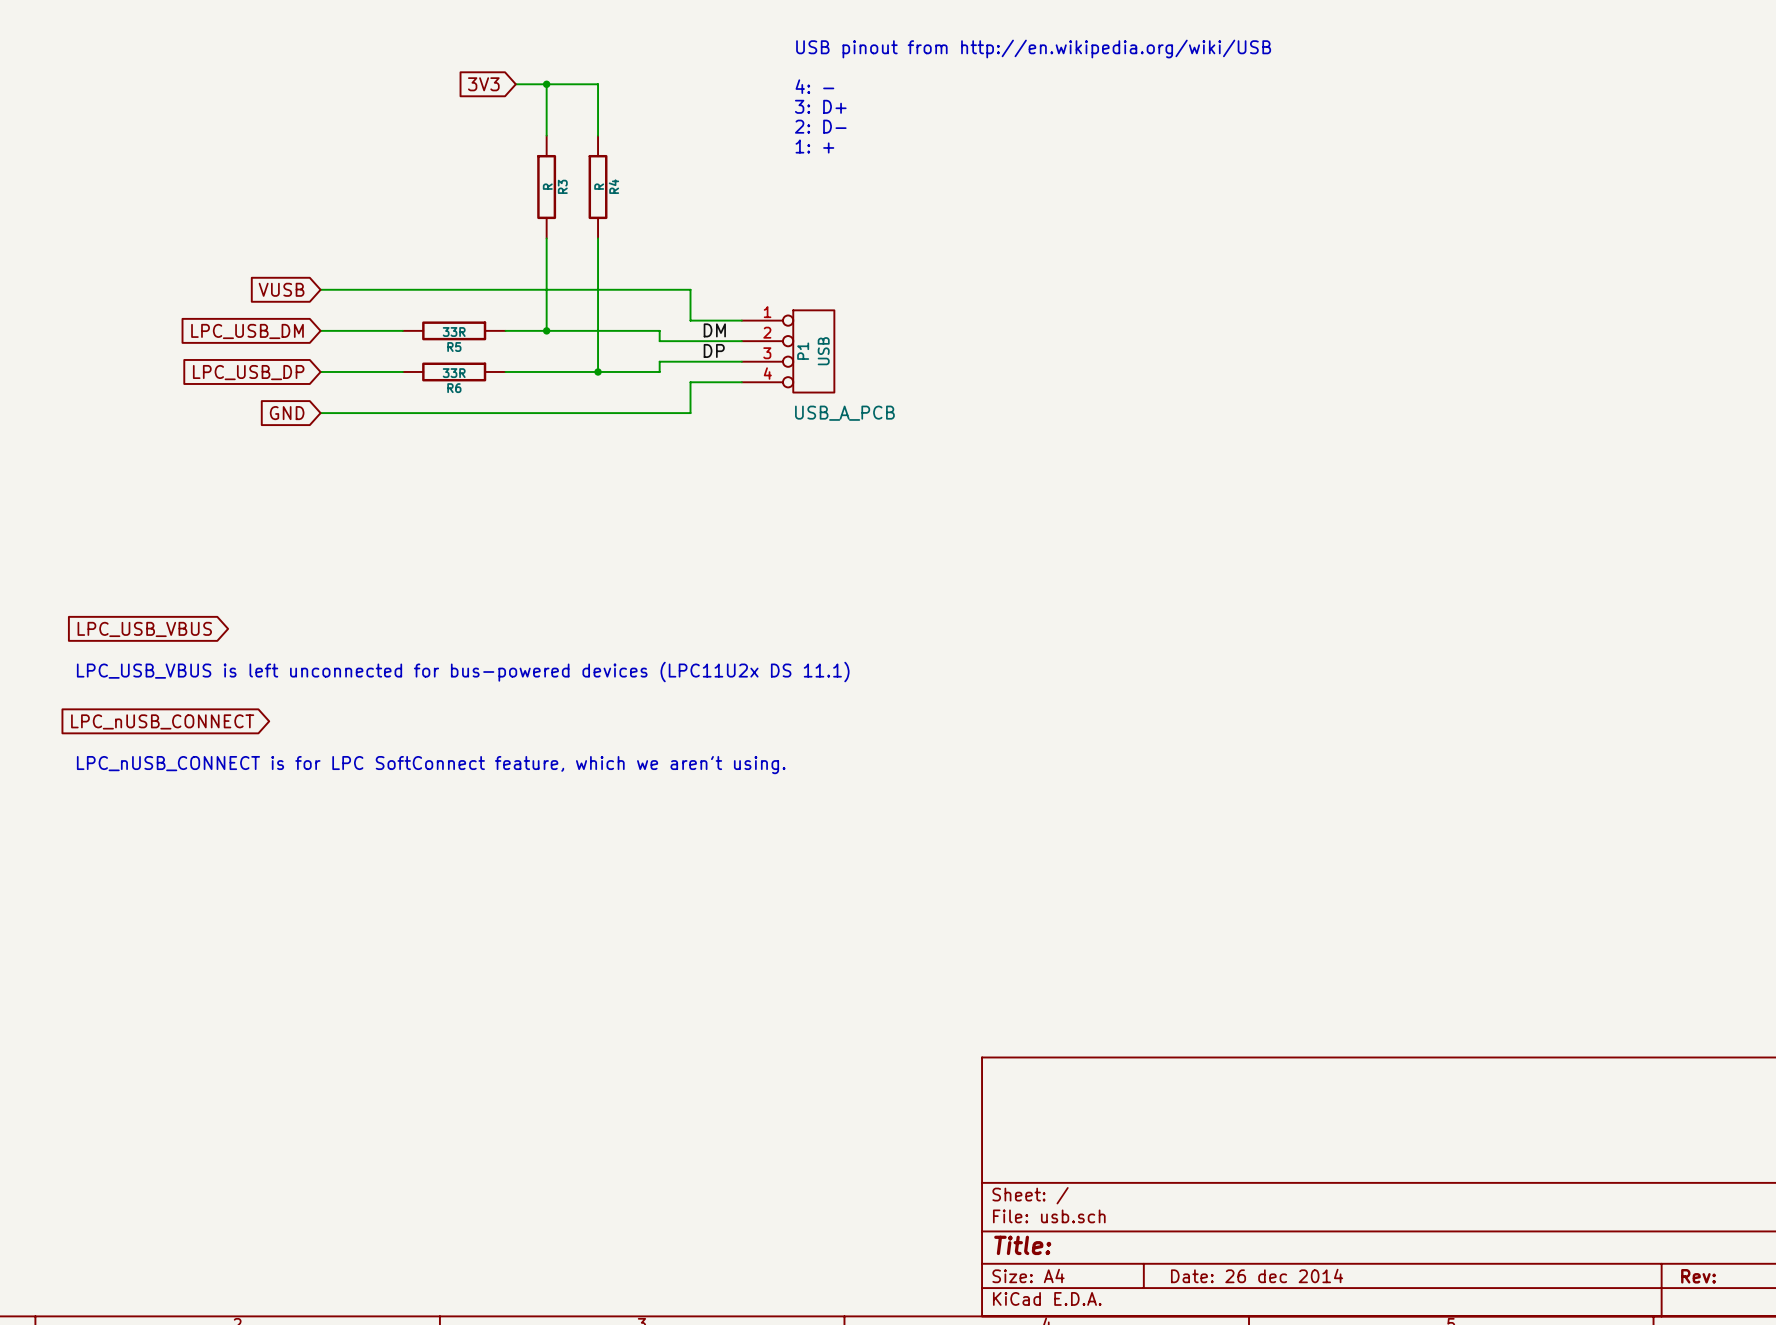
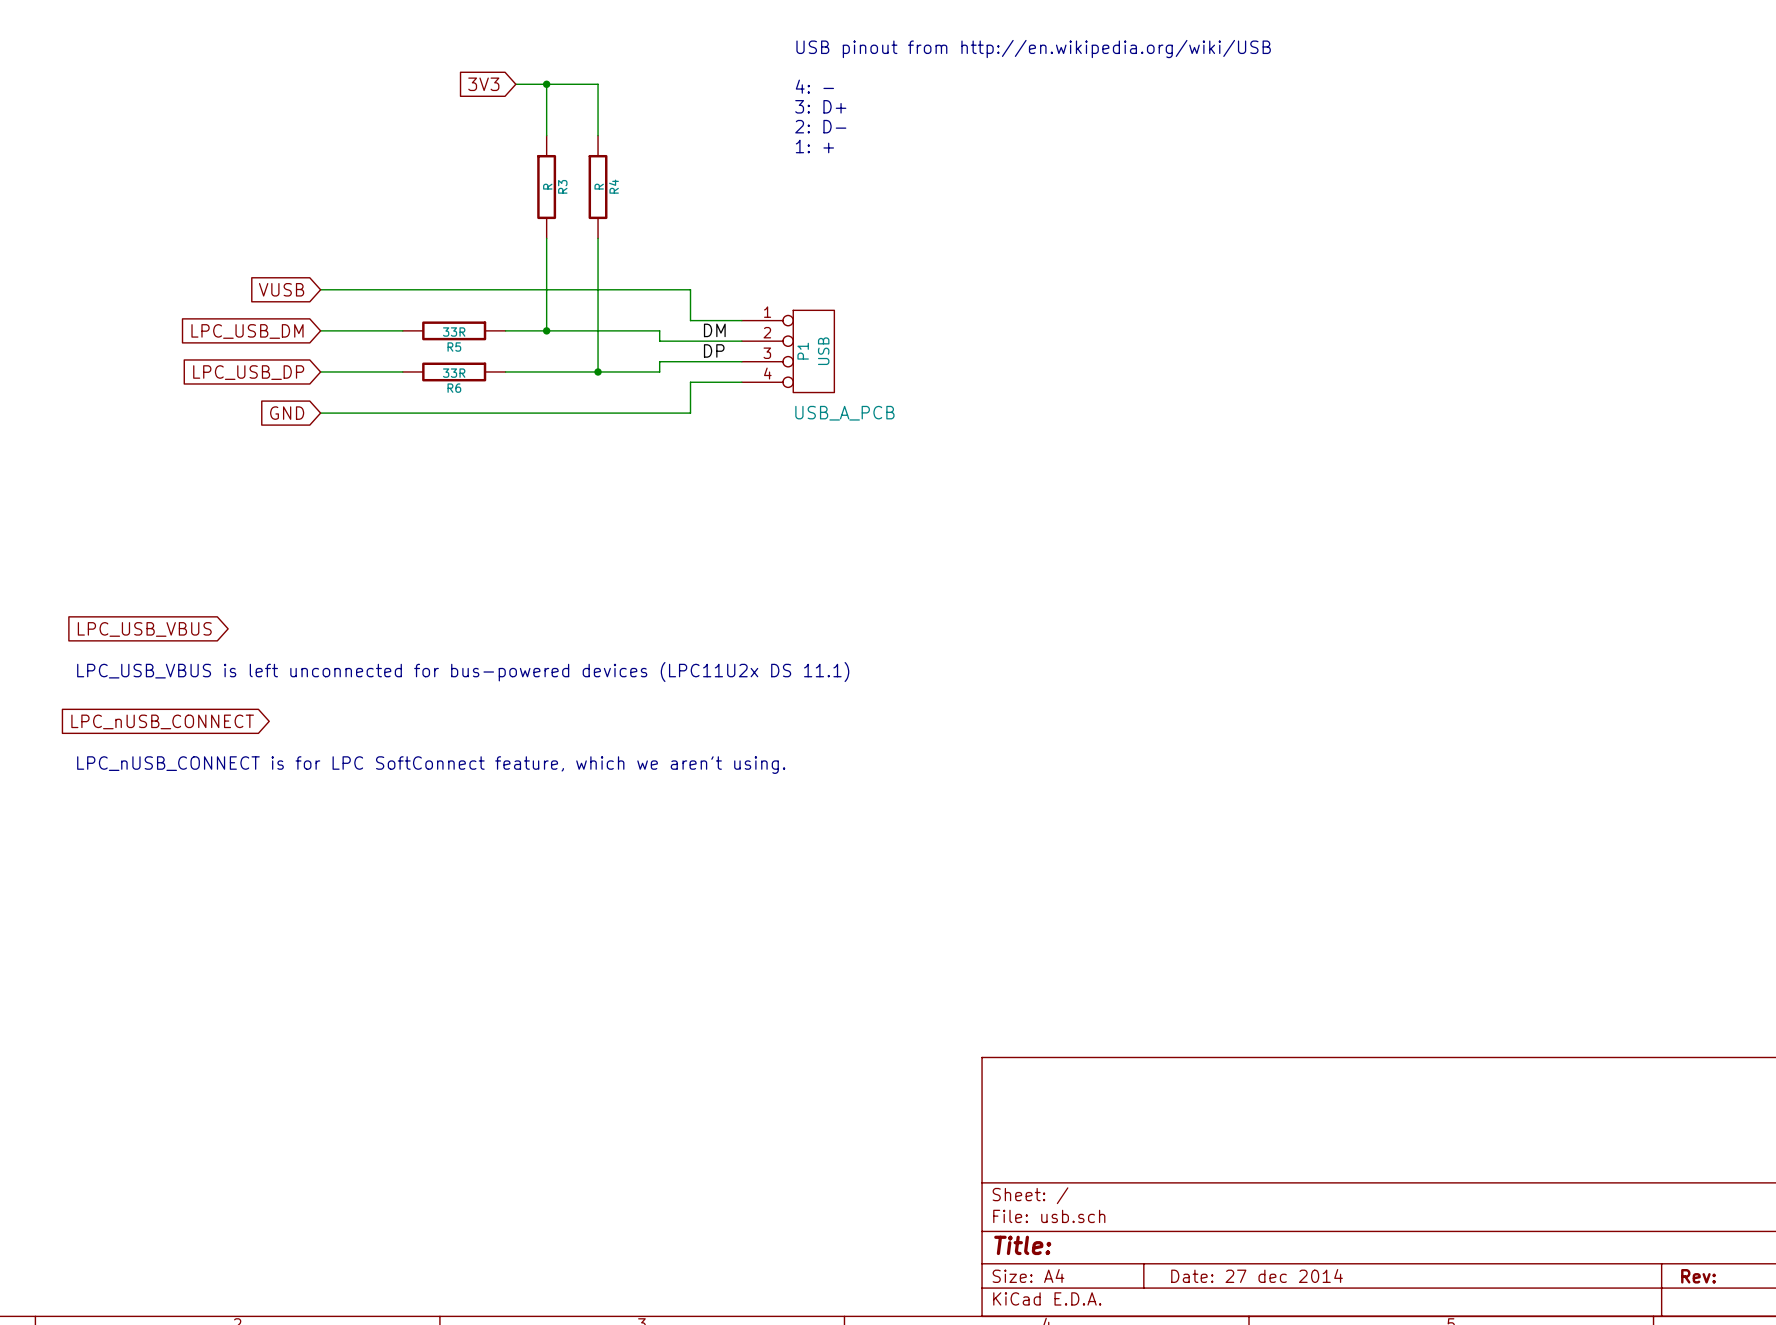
title block: Date: 26 dec 2014 (1257, 1275) -> Date: 27 dec 2014 (1257, 1275)

